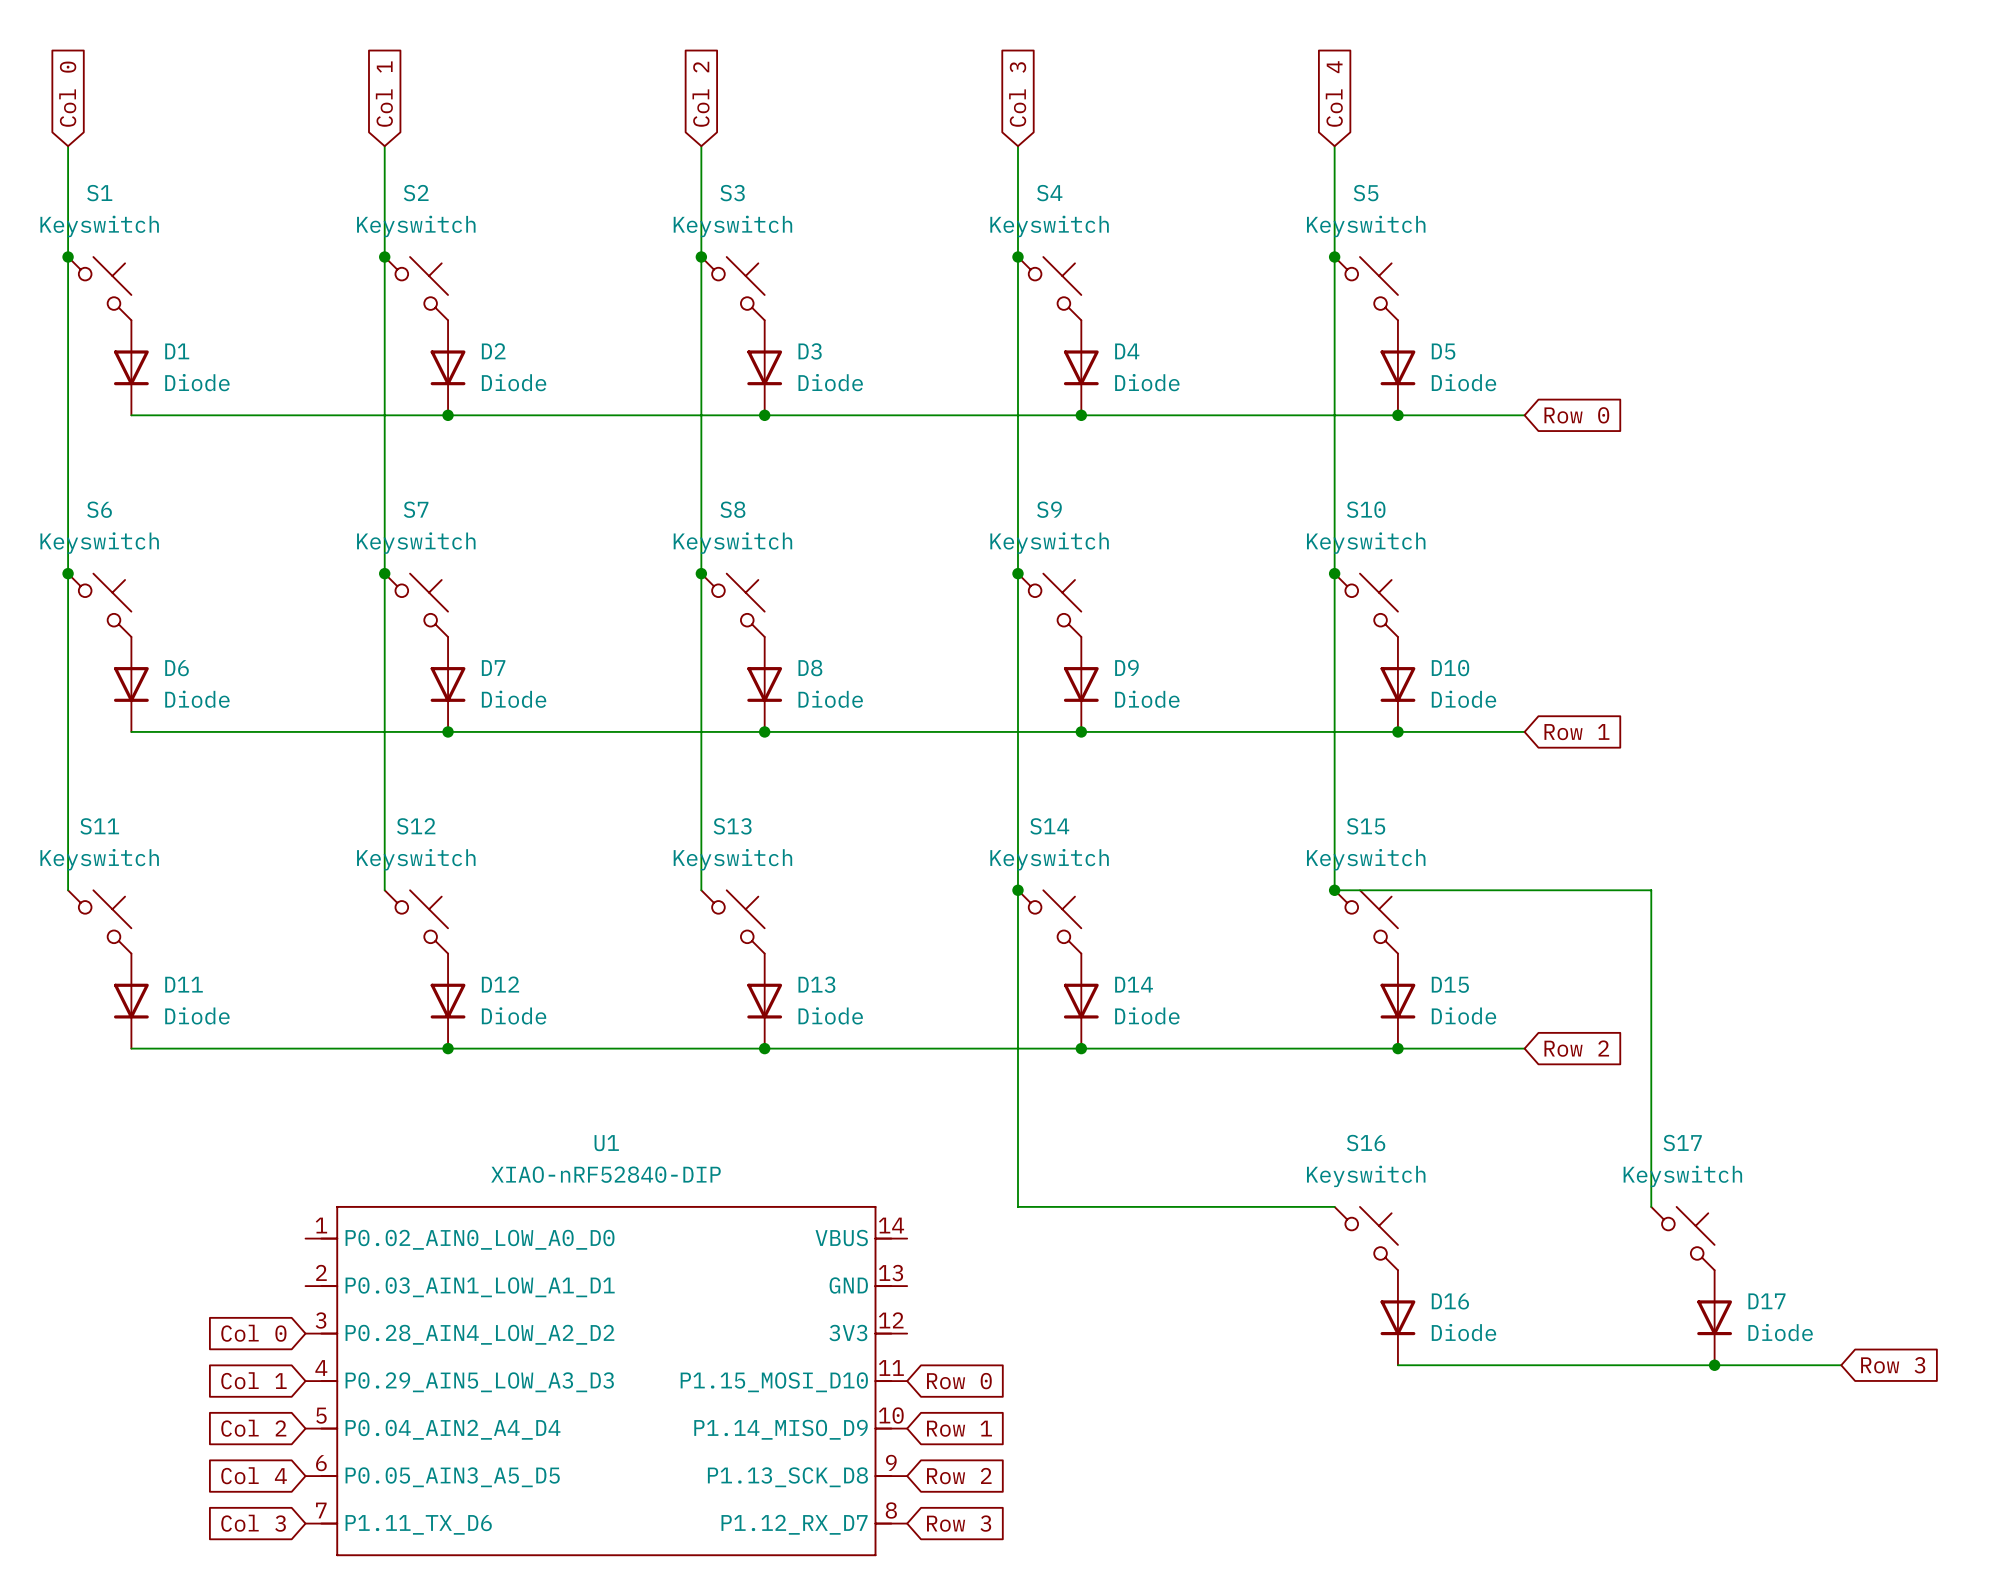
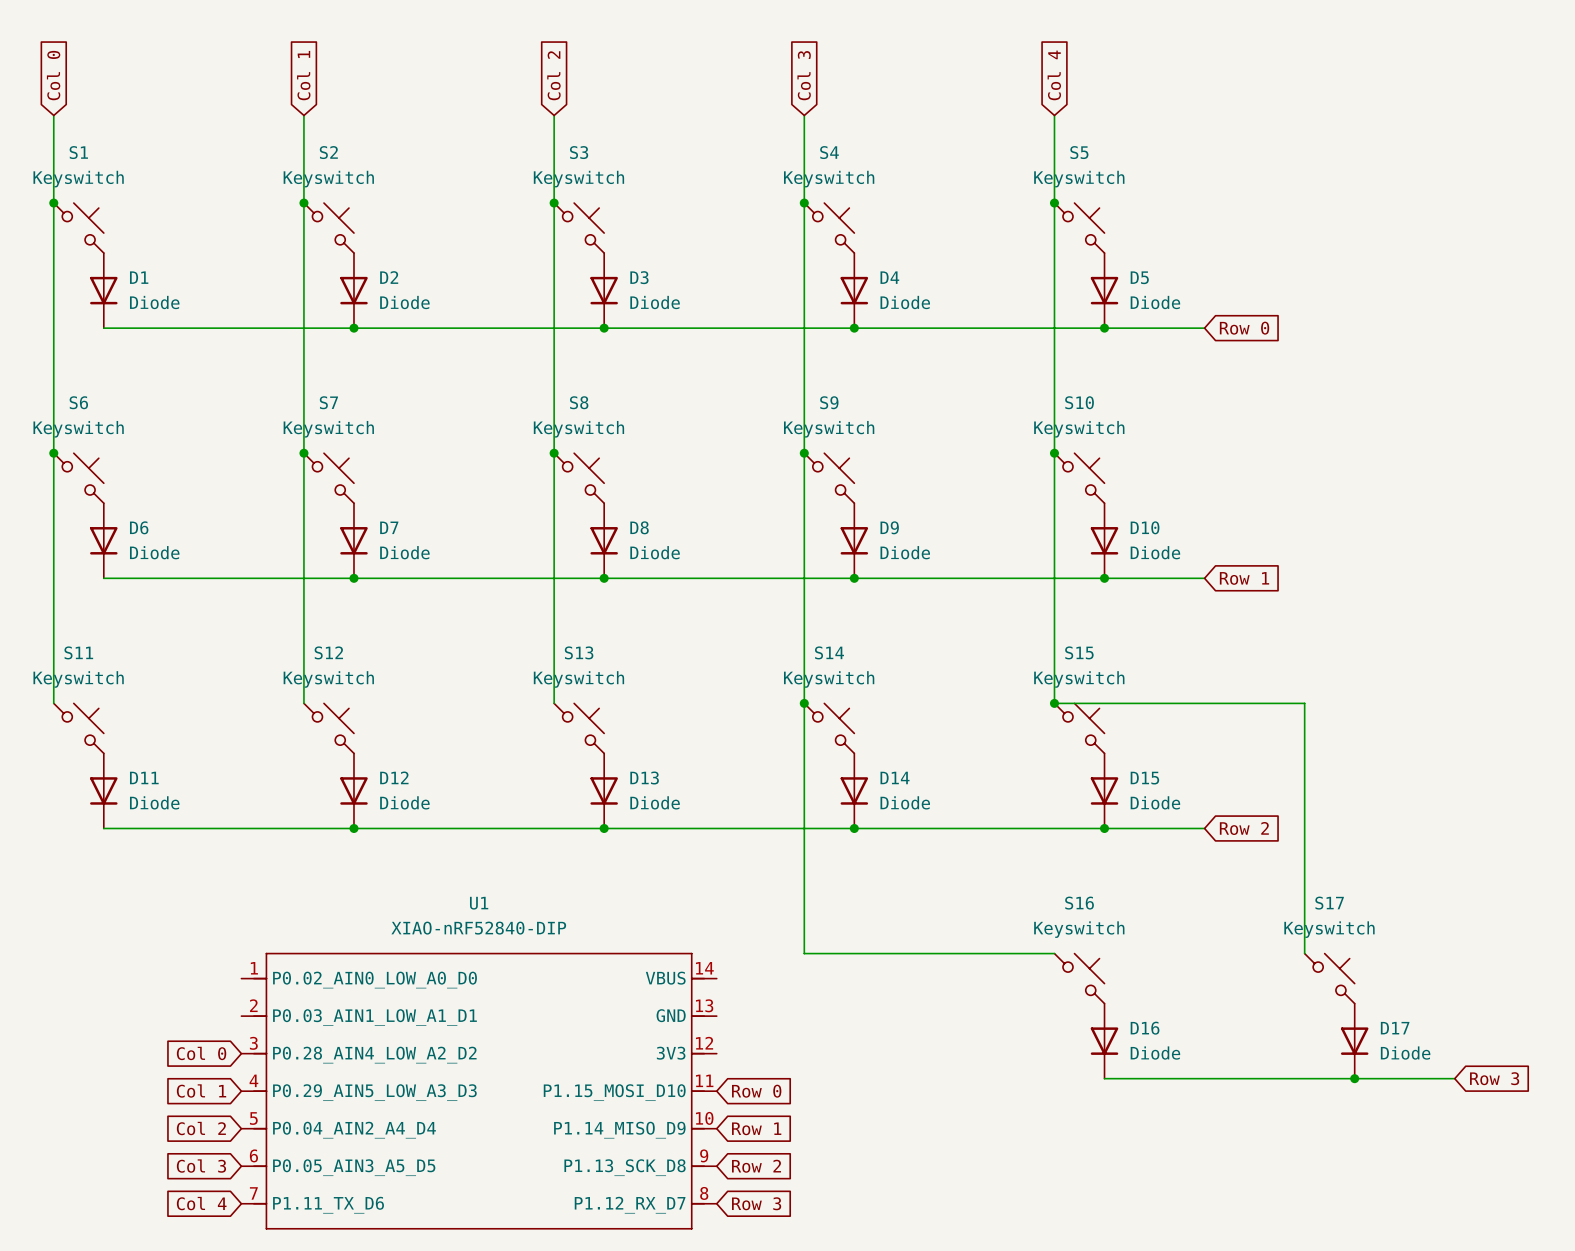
global label: Col 4 (254, 1475) -> Col 3 (201, 1166)
global label: Col 3 (253, 1523) -> Col 4 (201, 1203)

